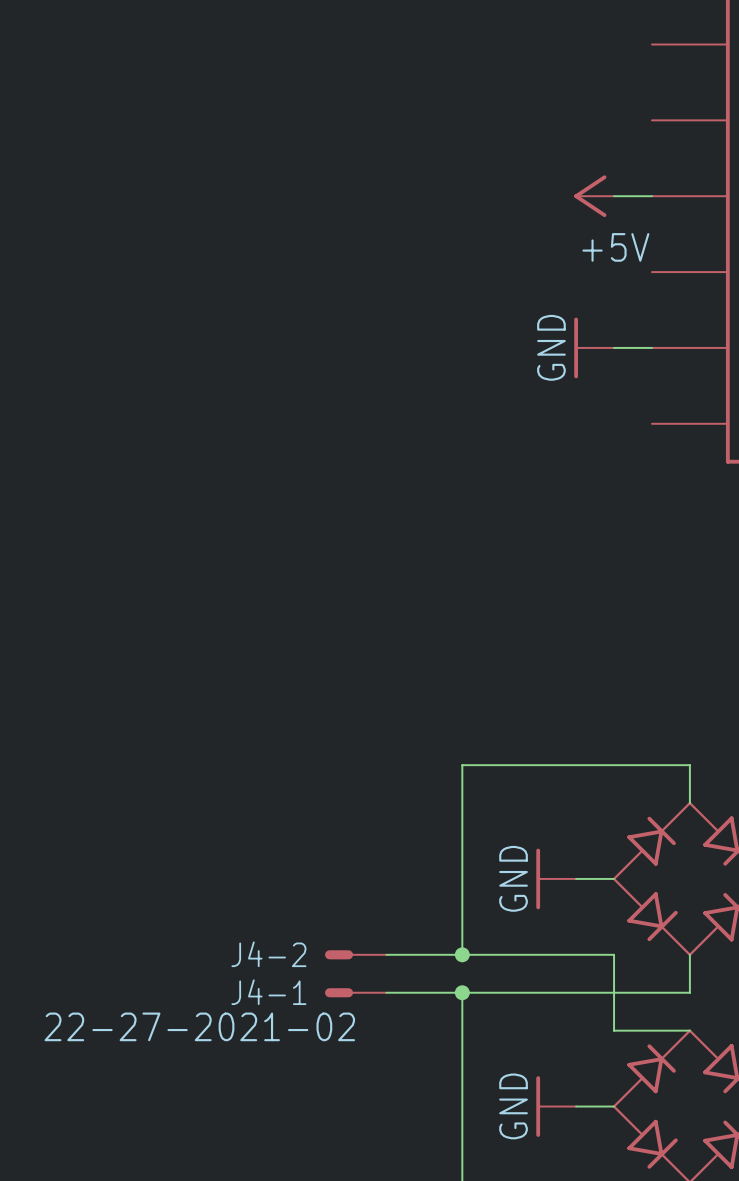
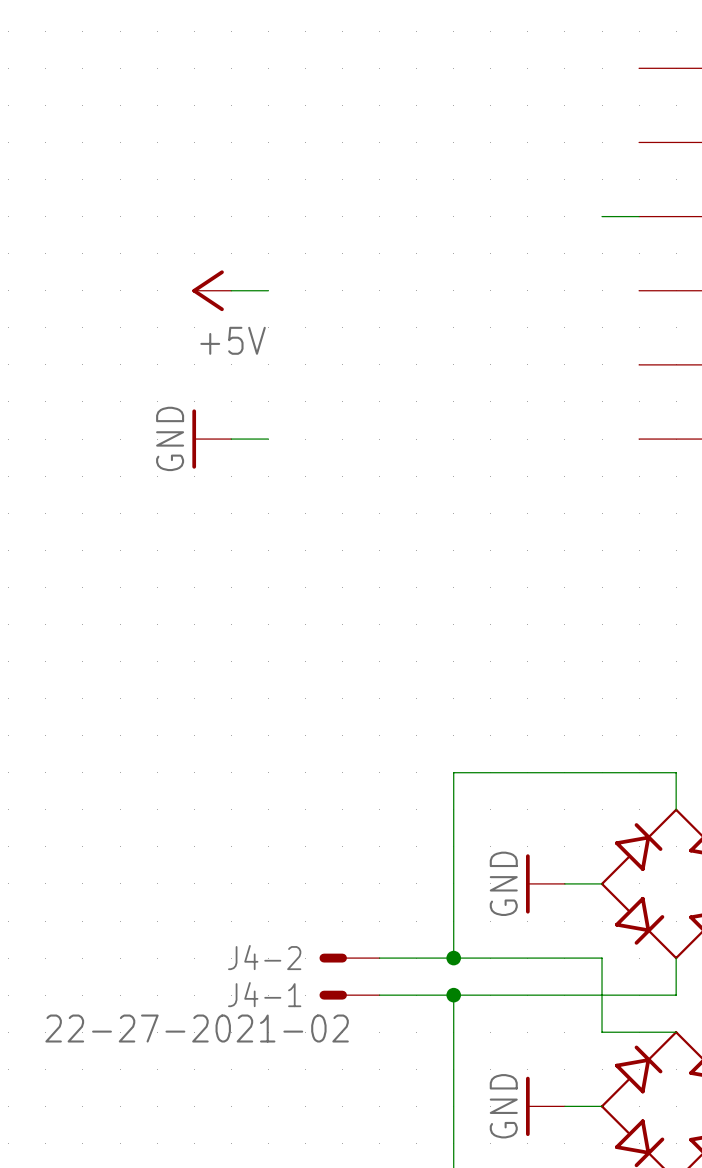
power symbol: +5V (594, 196) -> none
power symbol: none -> +5V (211, 290)
wire: none -> (231, 290) (268, 290)
power symbol: GND (594, 347) -> none
wire: (614, 347) (651, 347) -> none
power symbol: none -> GND (211, 439)
wire: none -> (231, 439) (268, 439)

